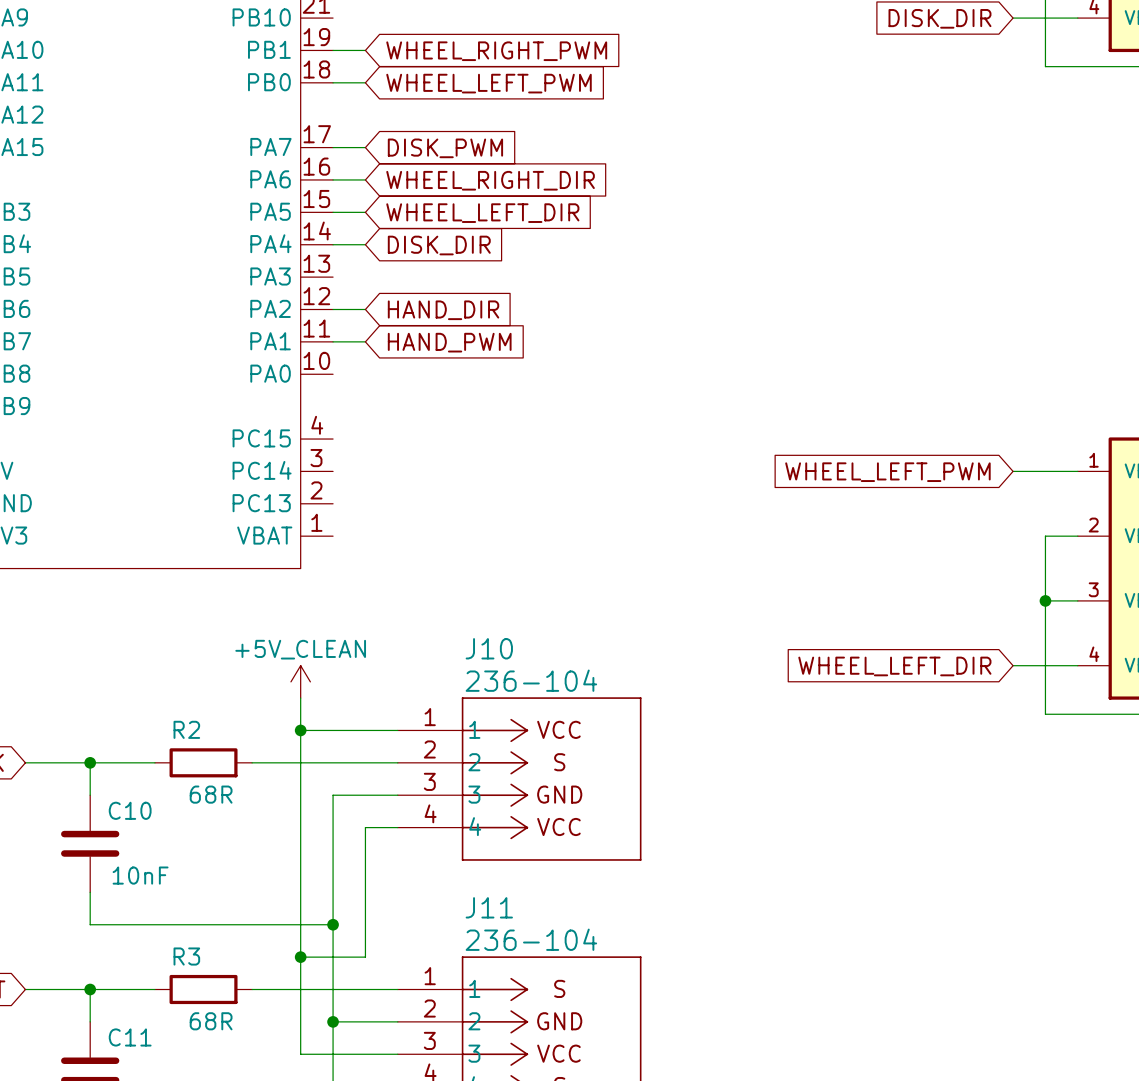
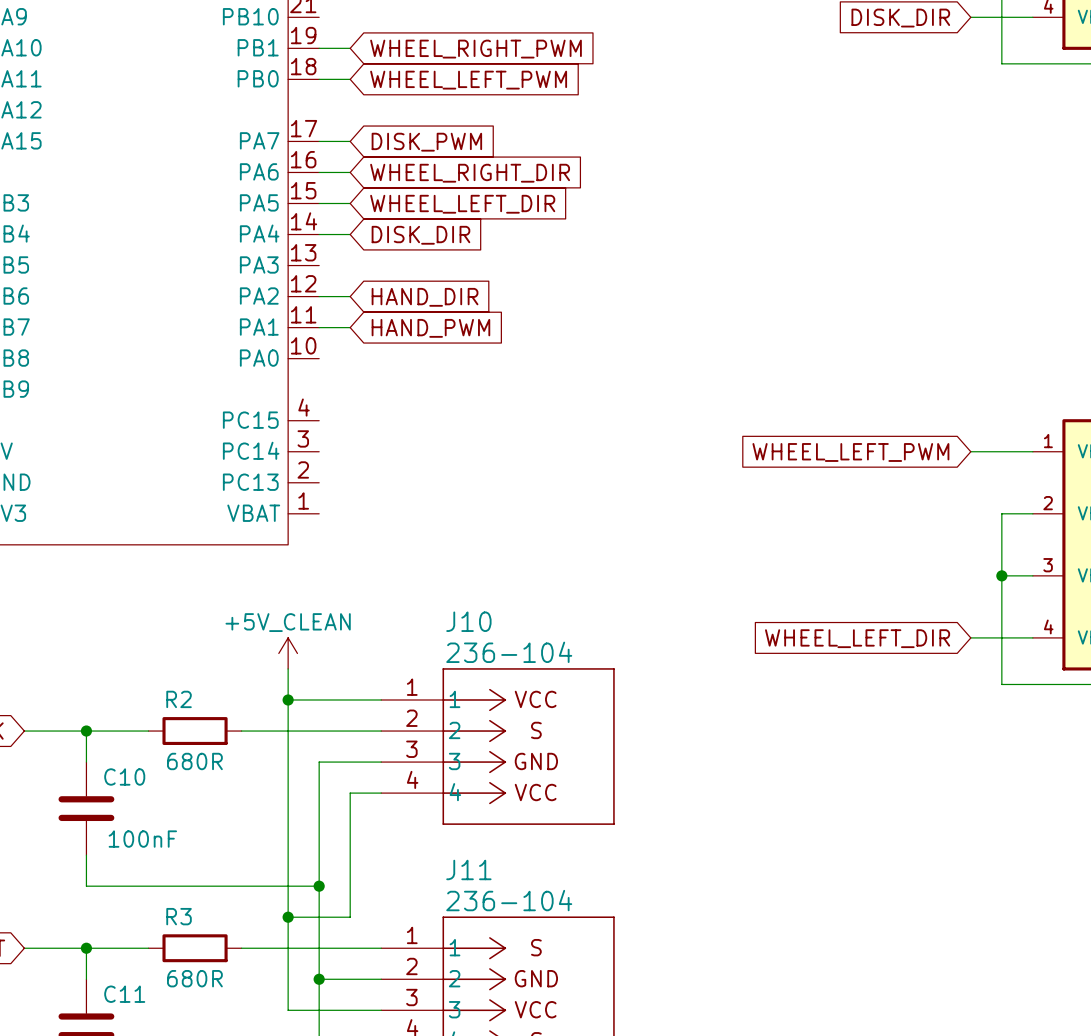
R2 value: 68R (211, 794) -> 680R (194, 761)
C10 value: 10nF (140, 875) -> 100nF (142, 839)
R3 value: 68R (211, 1021) -> 680R (194, 978)

